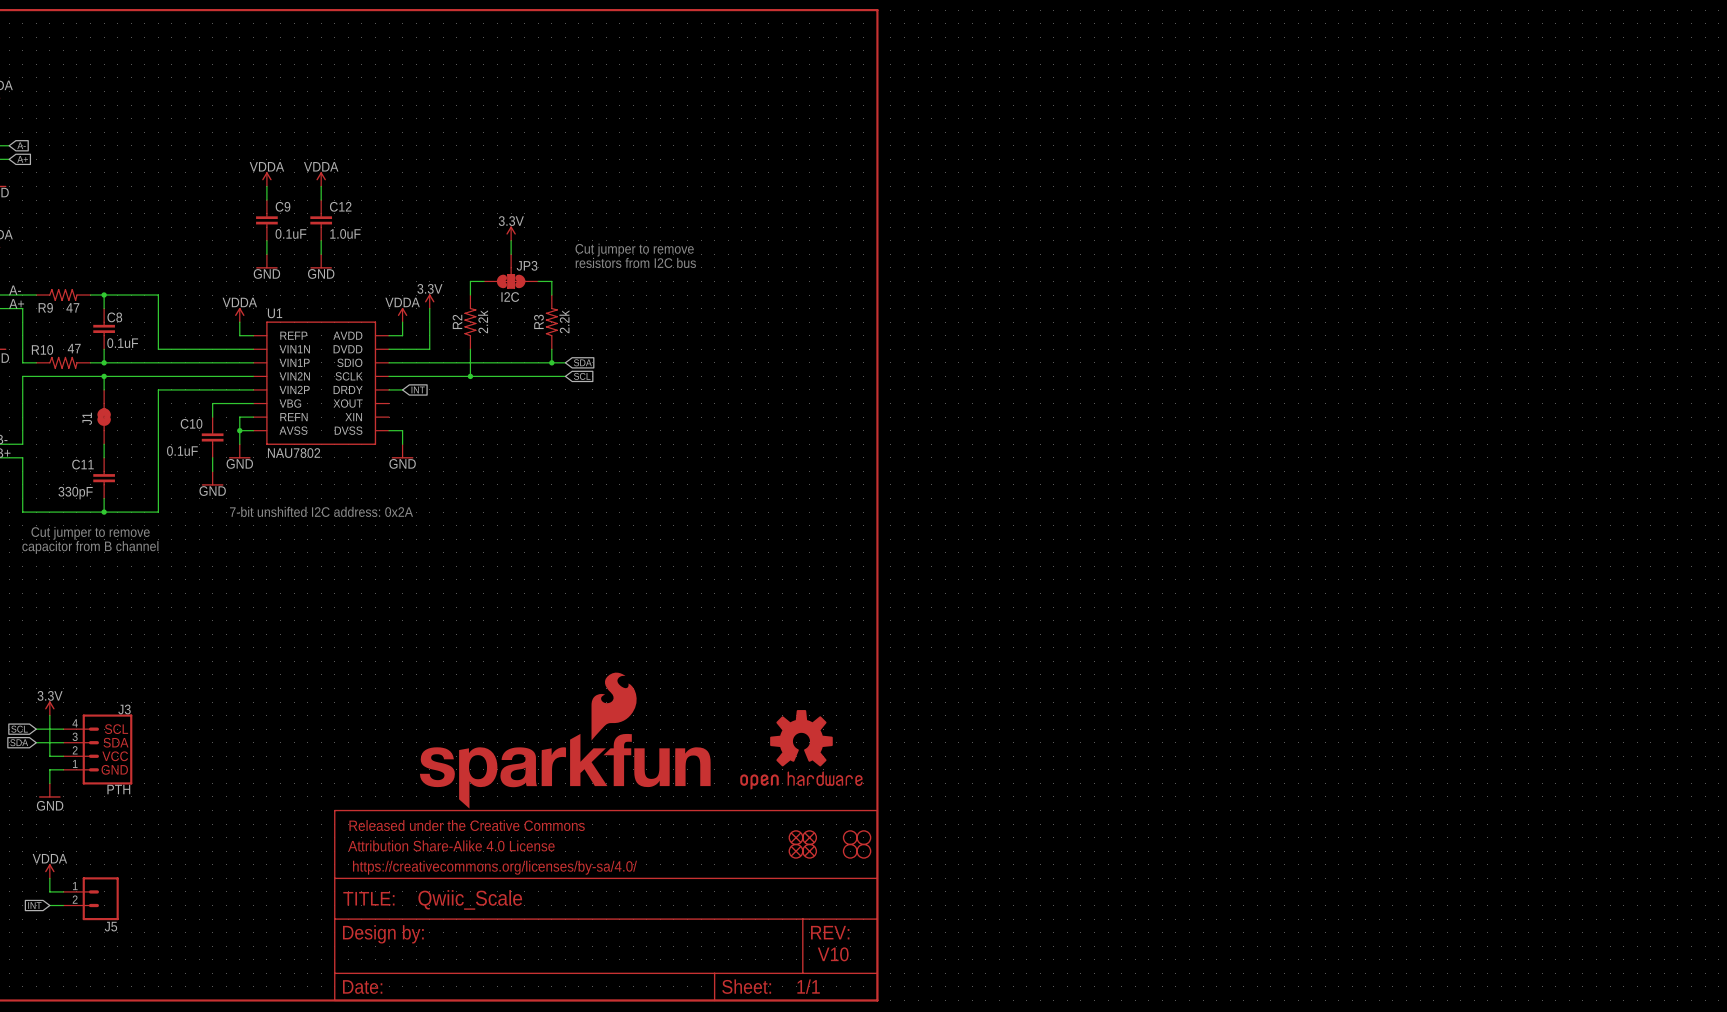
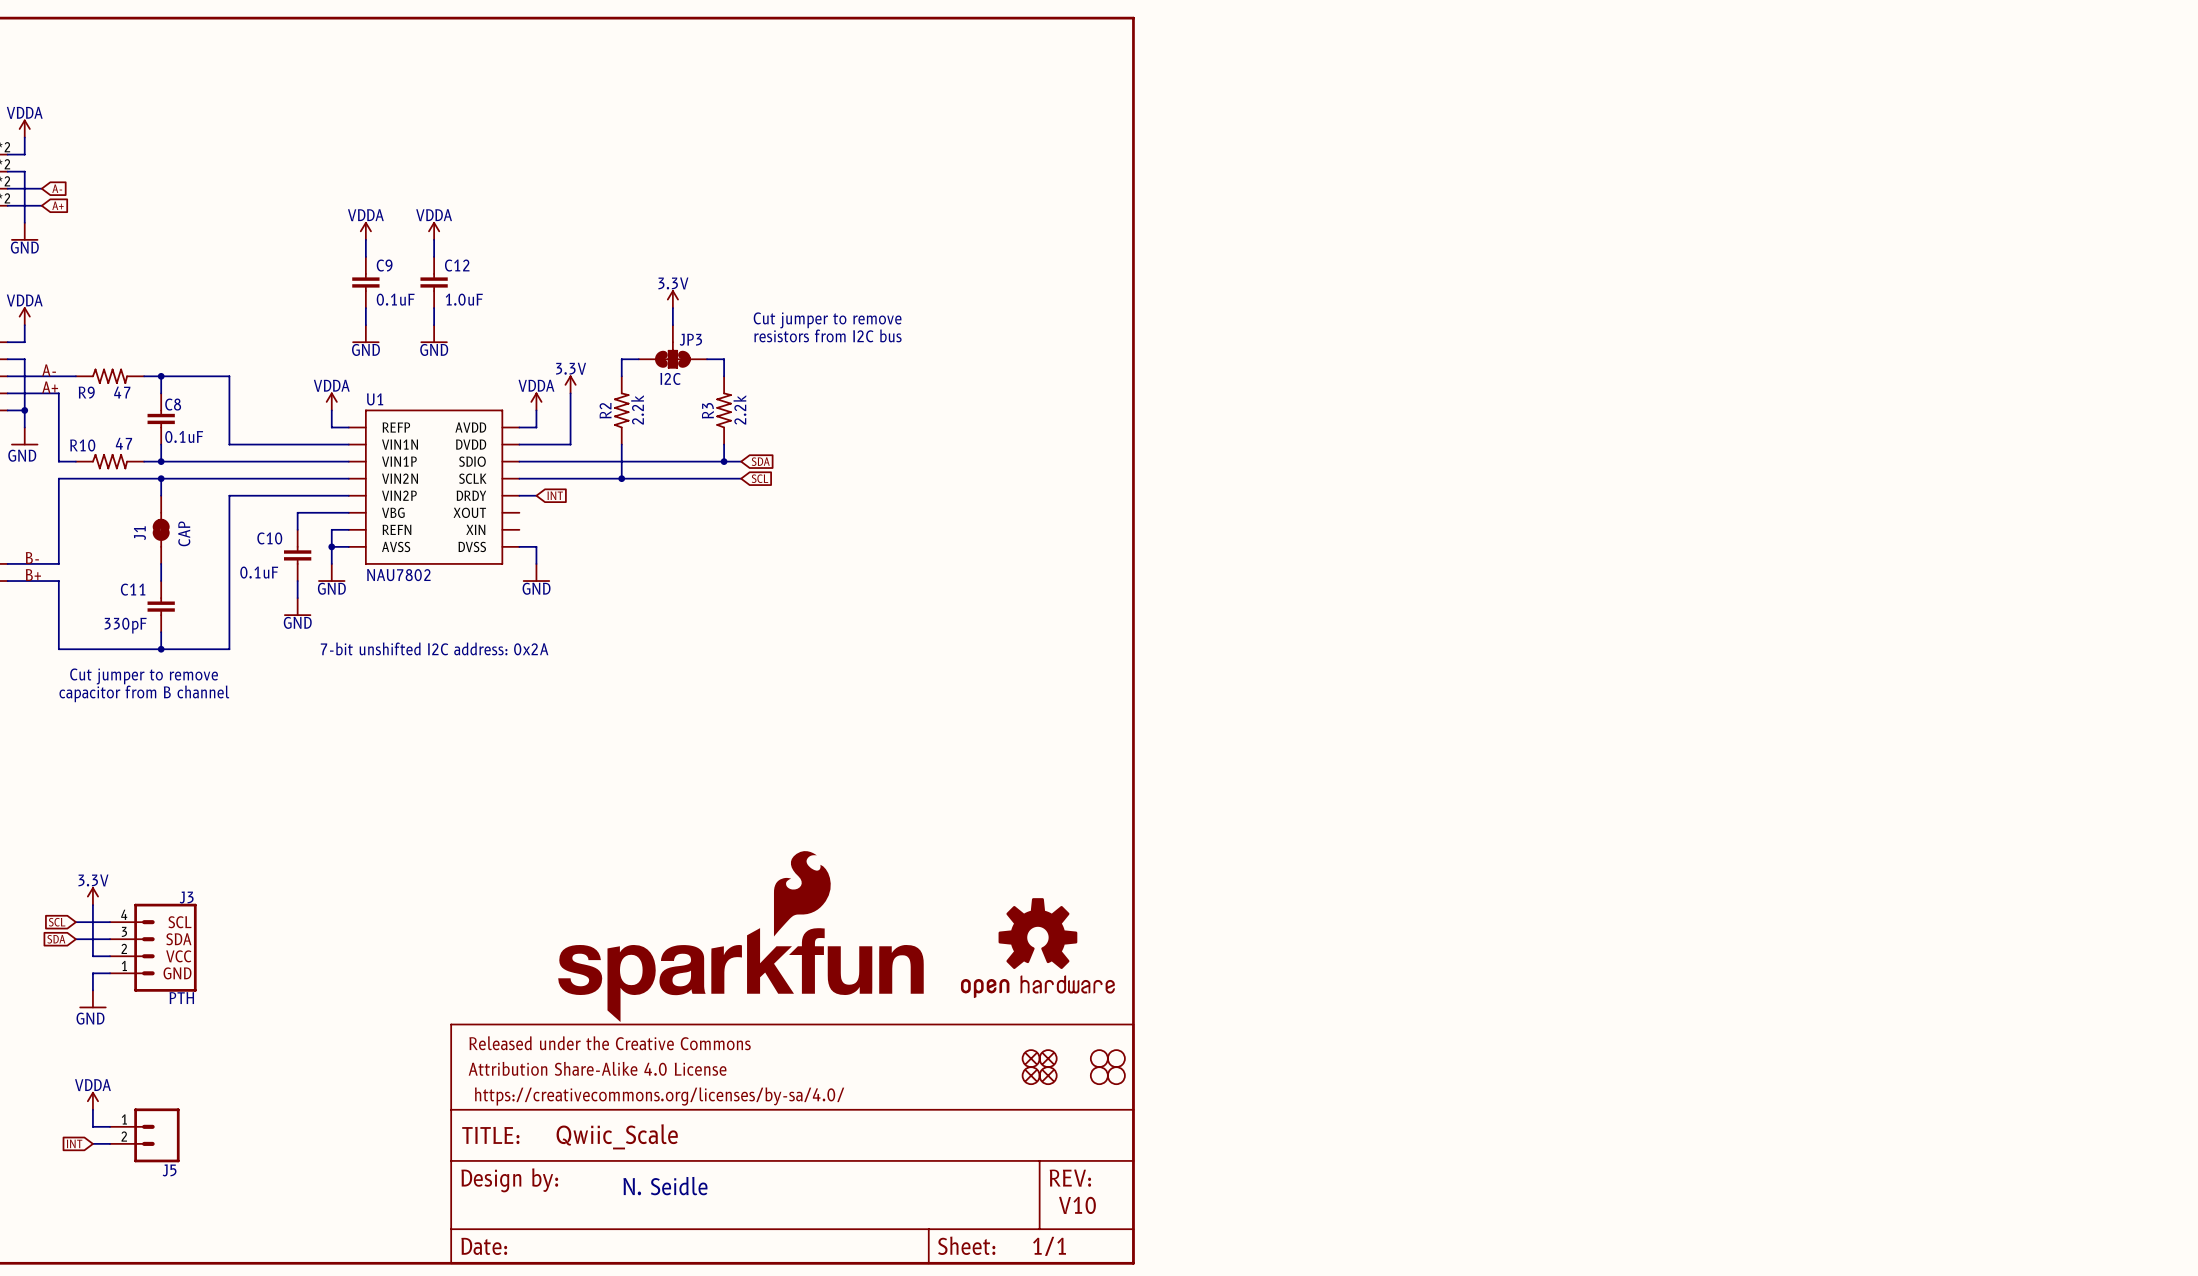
J1 value: none -> CAP (184, 533)
text: none -> N. Seidle (665, 1186)

